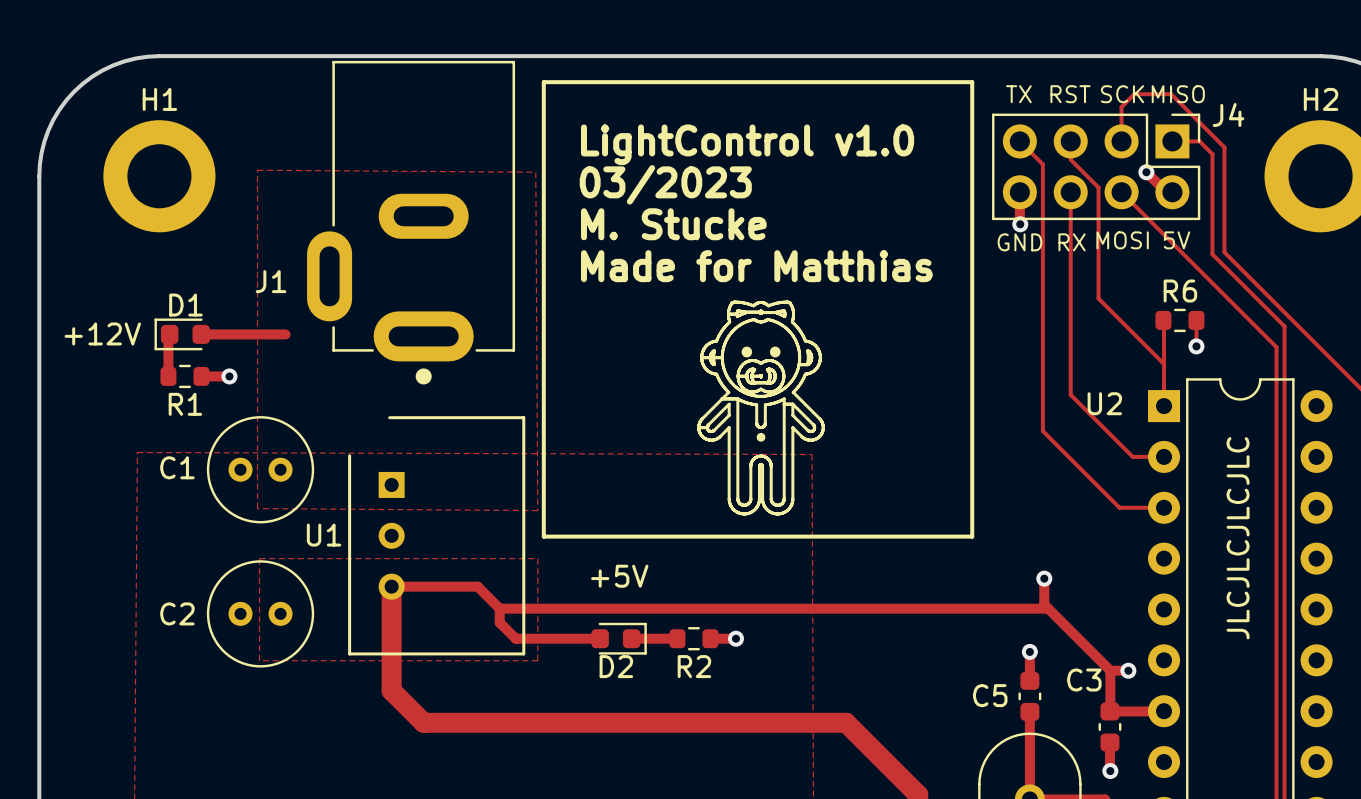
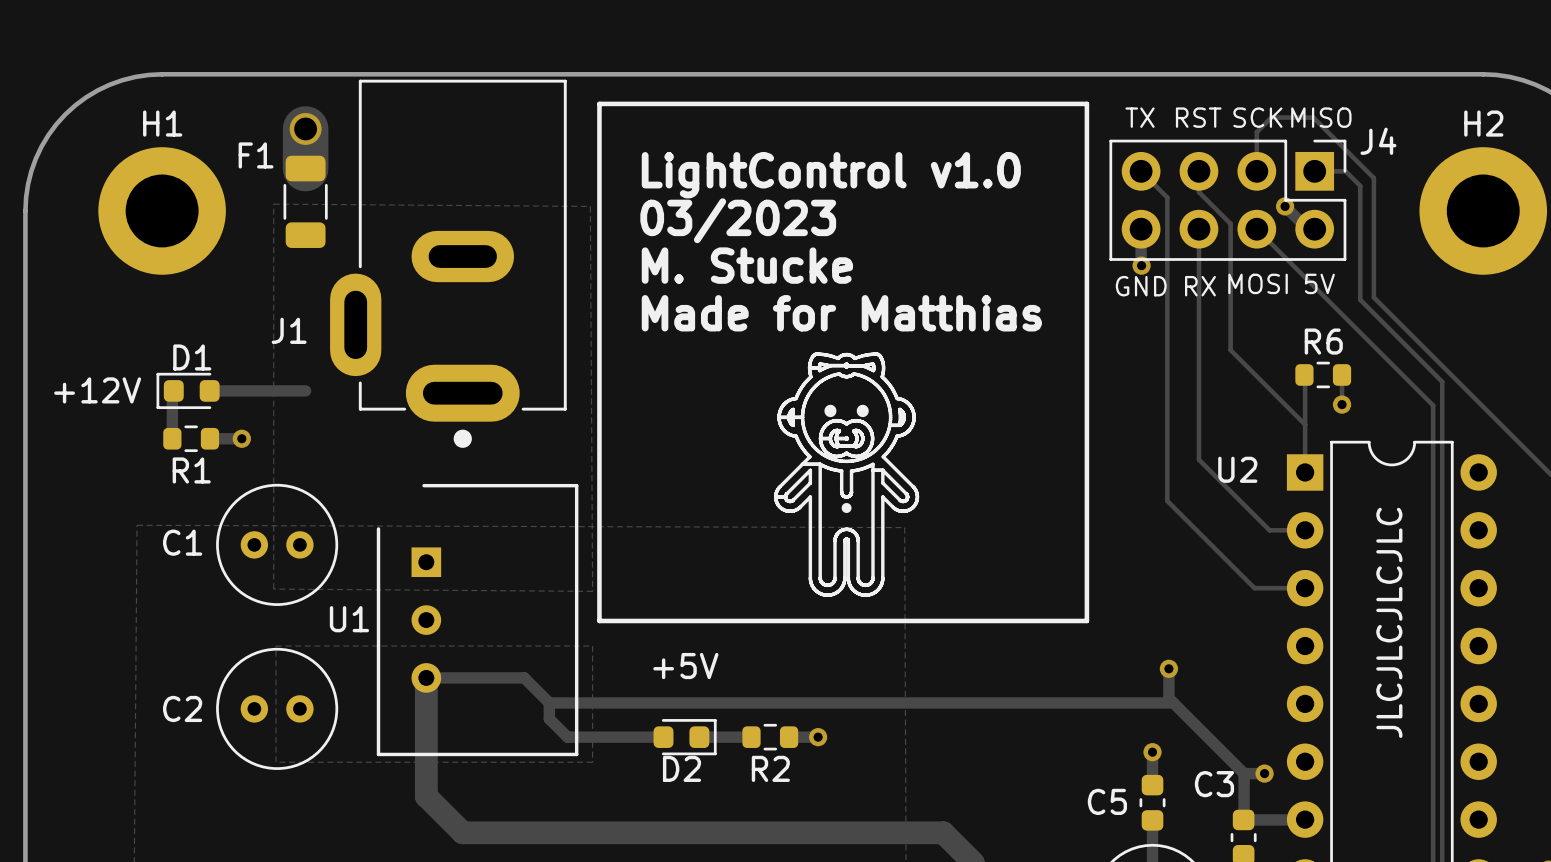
track: none -> (305, 128) (305, 168)
via: none -> (305, 128)
F1: none -> (305, 201)

